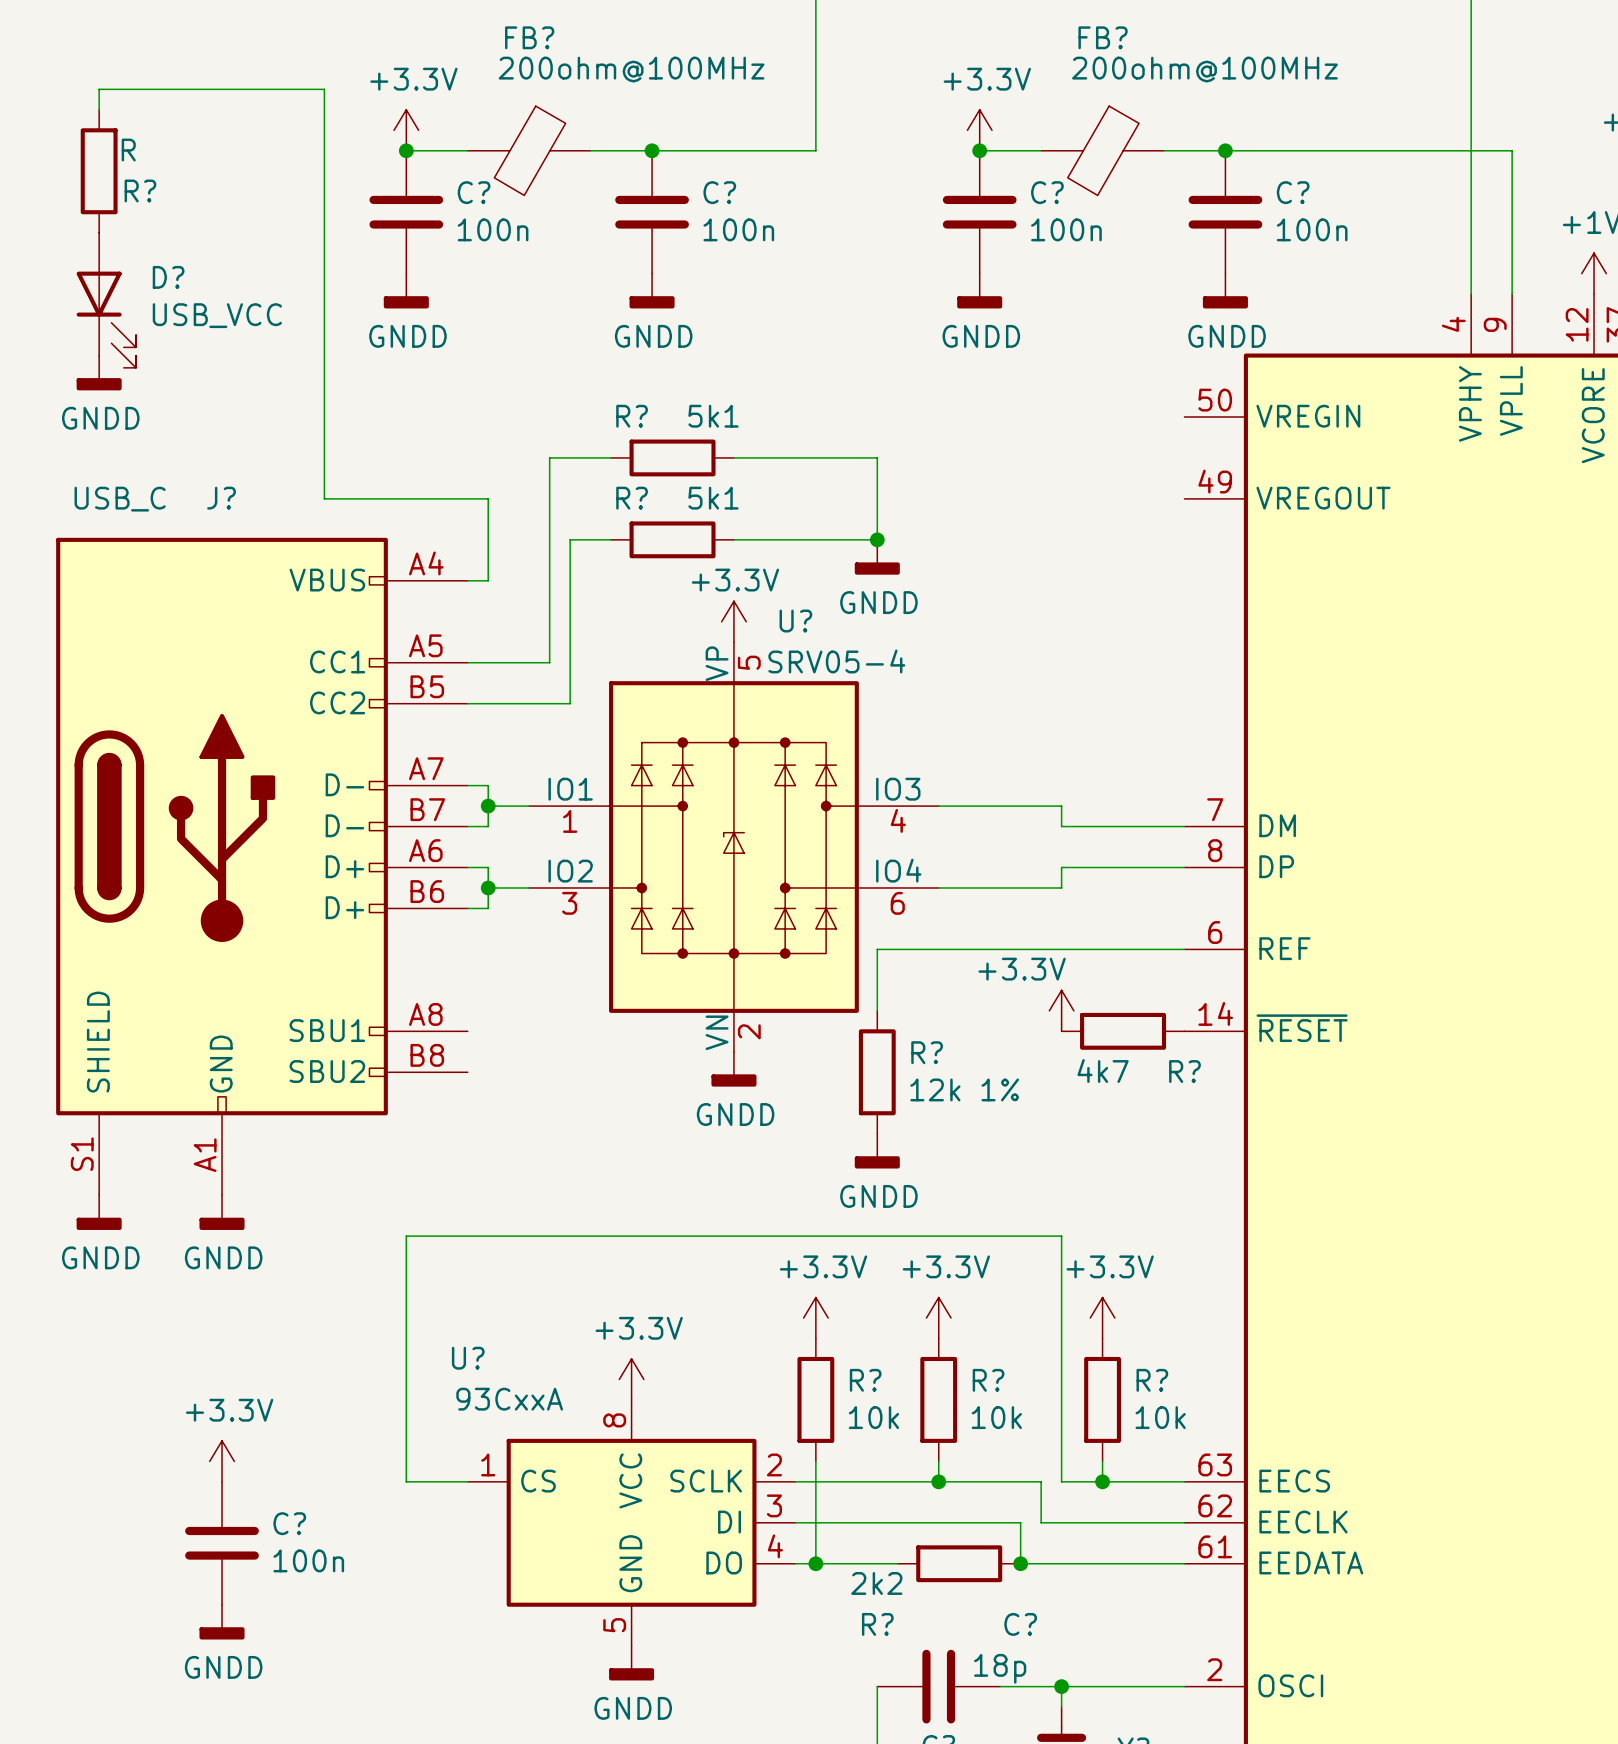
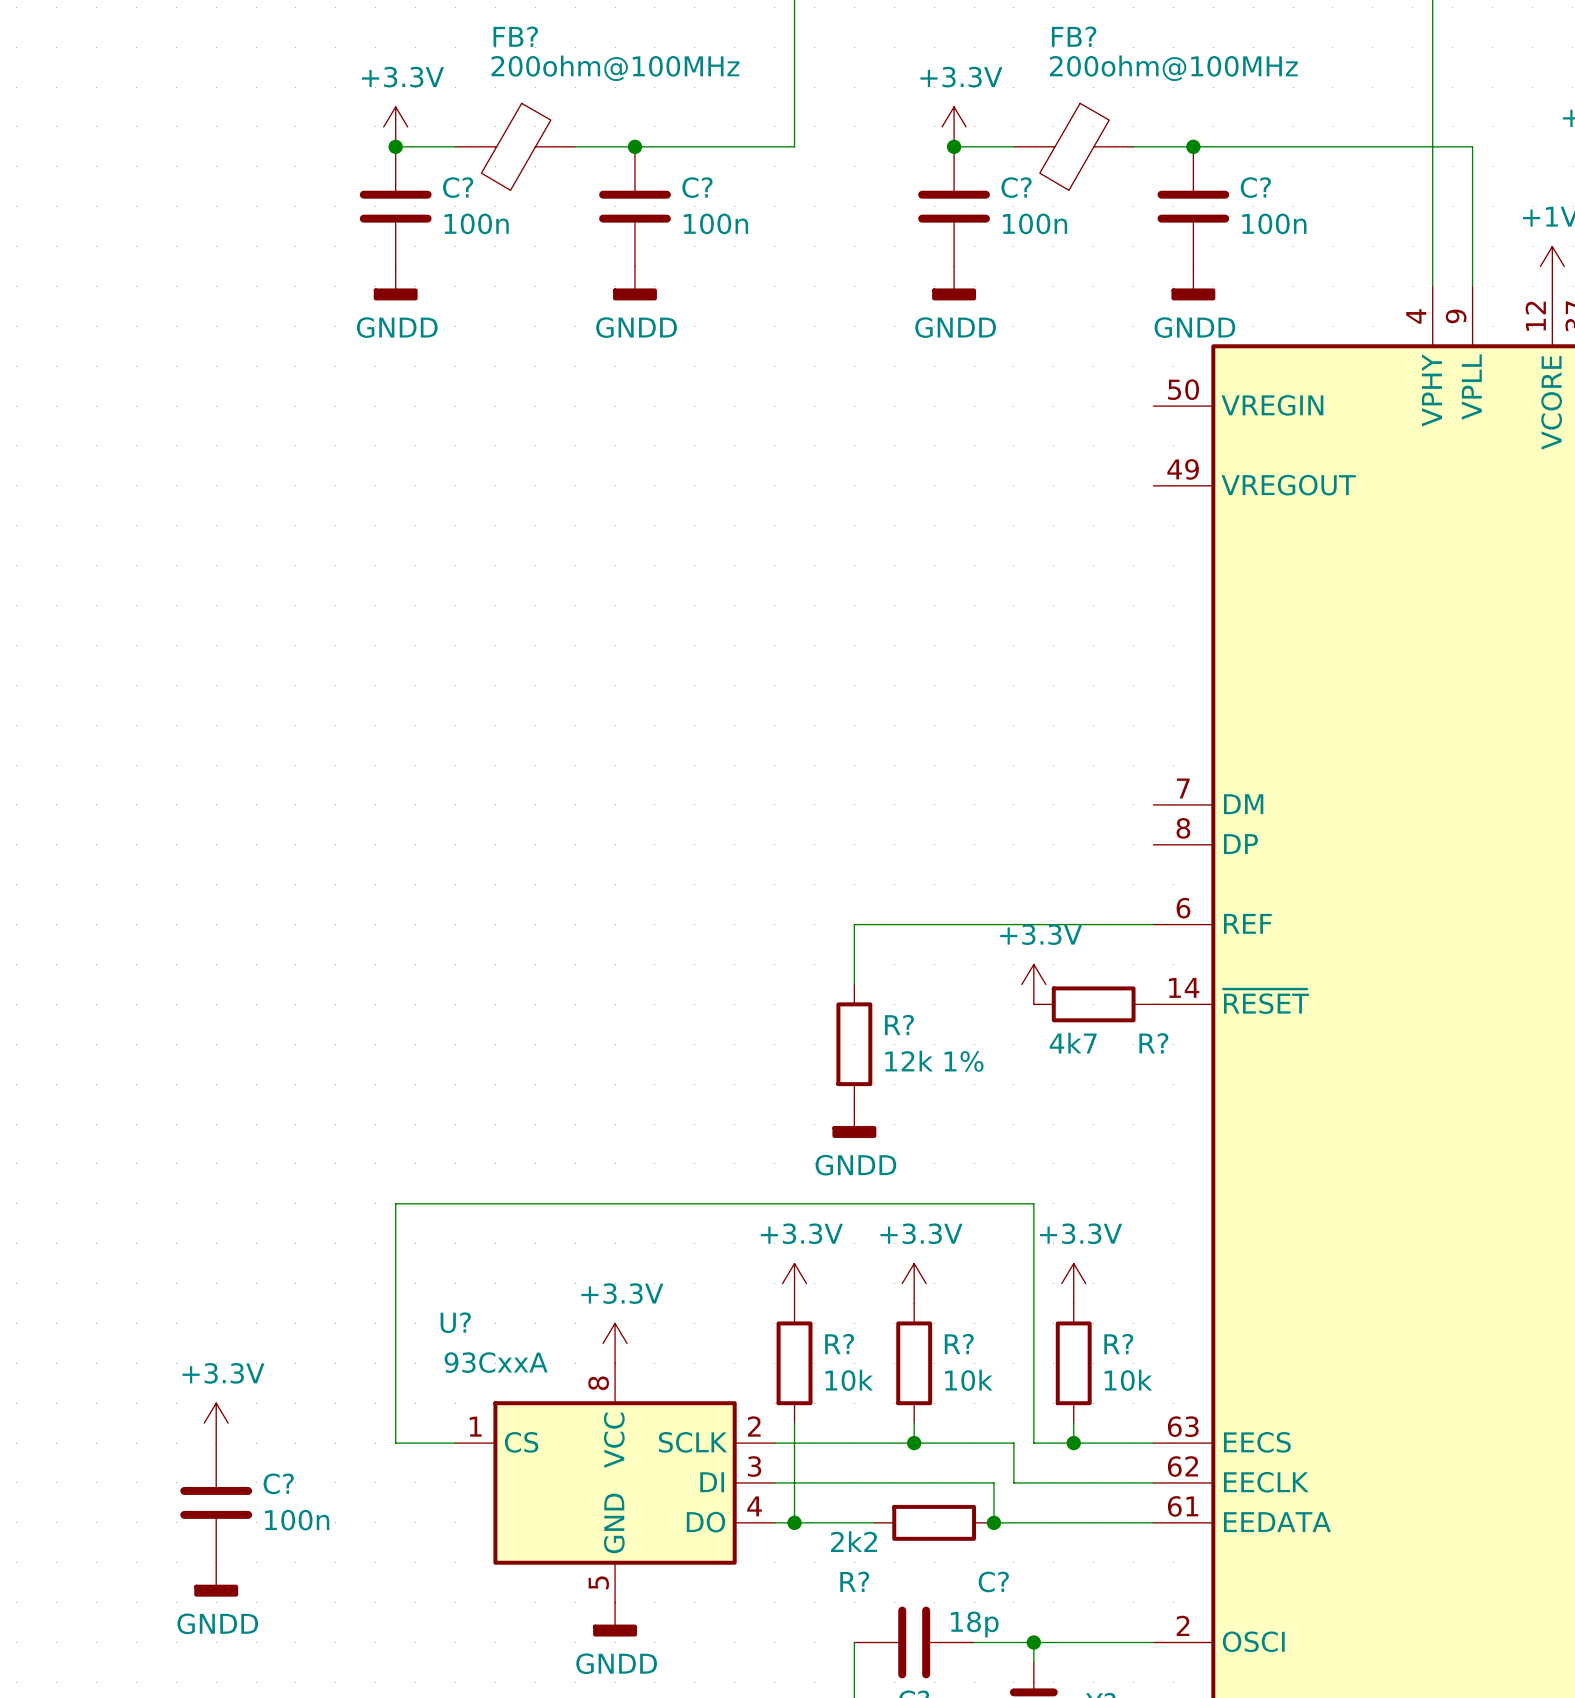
wire: (99, 109) (99, 89) (324, 89) (324, 498) (488, 498) (488, 580) (467, 580) -> none
R?: R (99, 171) -> none
D?: USB_VCC (106, 300) -> none
power symbol: GNDD (99, 372) -> none
wire: (611, 457) (549, 457) (549, 662) (467, 662) -> none
R?: 5k1 (672, 457) -> none
wire: (733, 457) (877, 457) (877, 539) (733, 539) -> none
wire: (611, 539) (570, 539) (570, 703) (467, 703) -> none
R?: 5k1 (672, 539) -> none
junction: (877, 539) -> none
power symbol: GNDD (877, 557) -> none
power symbol: +3.3V (733, 621) -> none
wire: (467, 785) (488, 785) (488, 826) (467, 826) -> none
wire: (488, 806) (529, 806) -> none
junction: (488, 806) -> none
wire: (938, 806) (1061, 806) (1061, 826) (1184, 826) -> none
U?: SRV05-4 (733, 847) -> none
J?: USB_C (261, 866) -> none
wire: (467, 867) (488, 867) (488, 908) (467, 908) -> none
wire: (1184, 867) (1061, 867) (1061, 887) (938, 887) -> none
wire: (488, 887) (529, 887) -> none
junction: (488, 887) -> none
power symbol text position: +3.3V (1022, 969) -> +3.3V (1041, 934)
power symbol: GNDD (733, 1069) -> none
power symbol: GNDD (99, 1212) -> none
power symbol: GNDD (222, 1212) -> none

